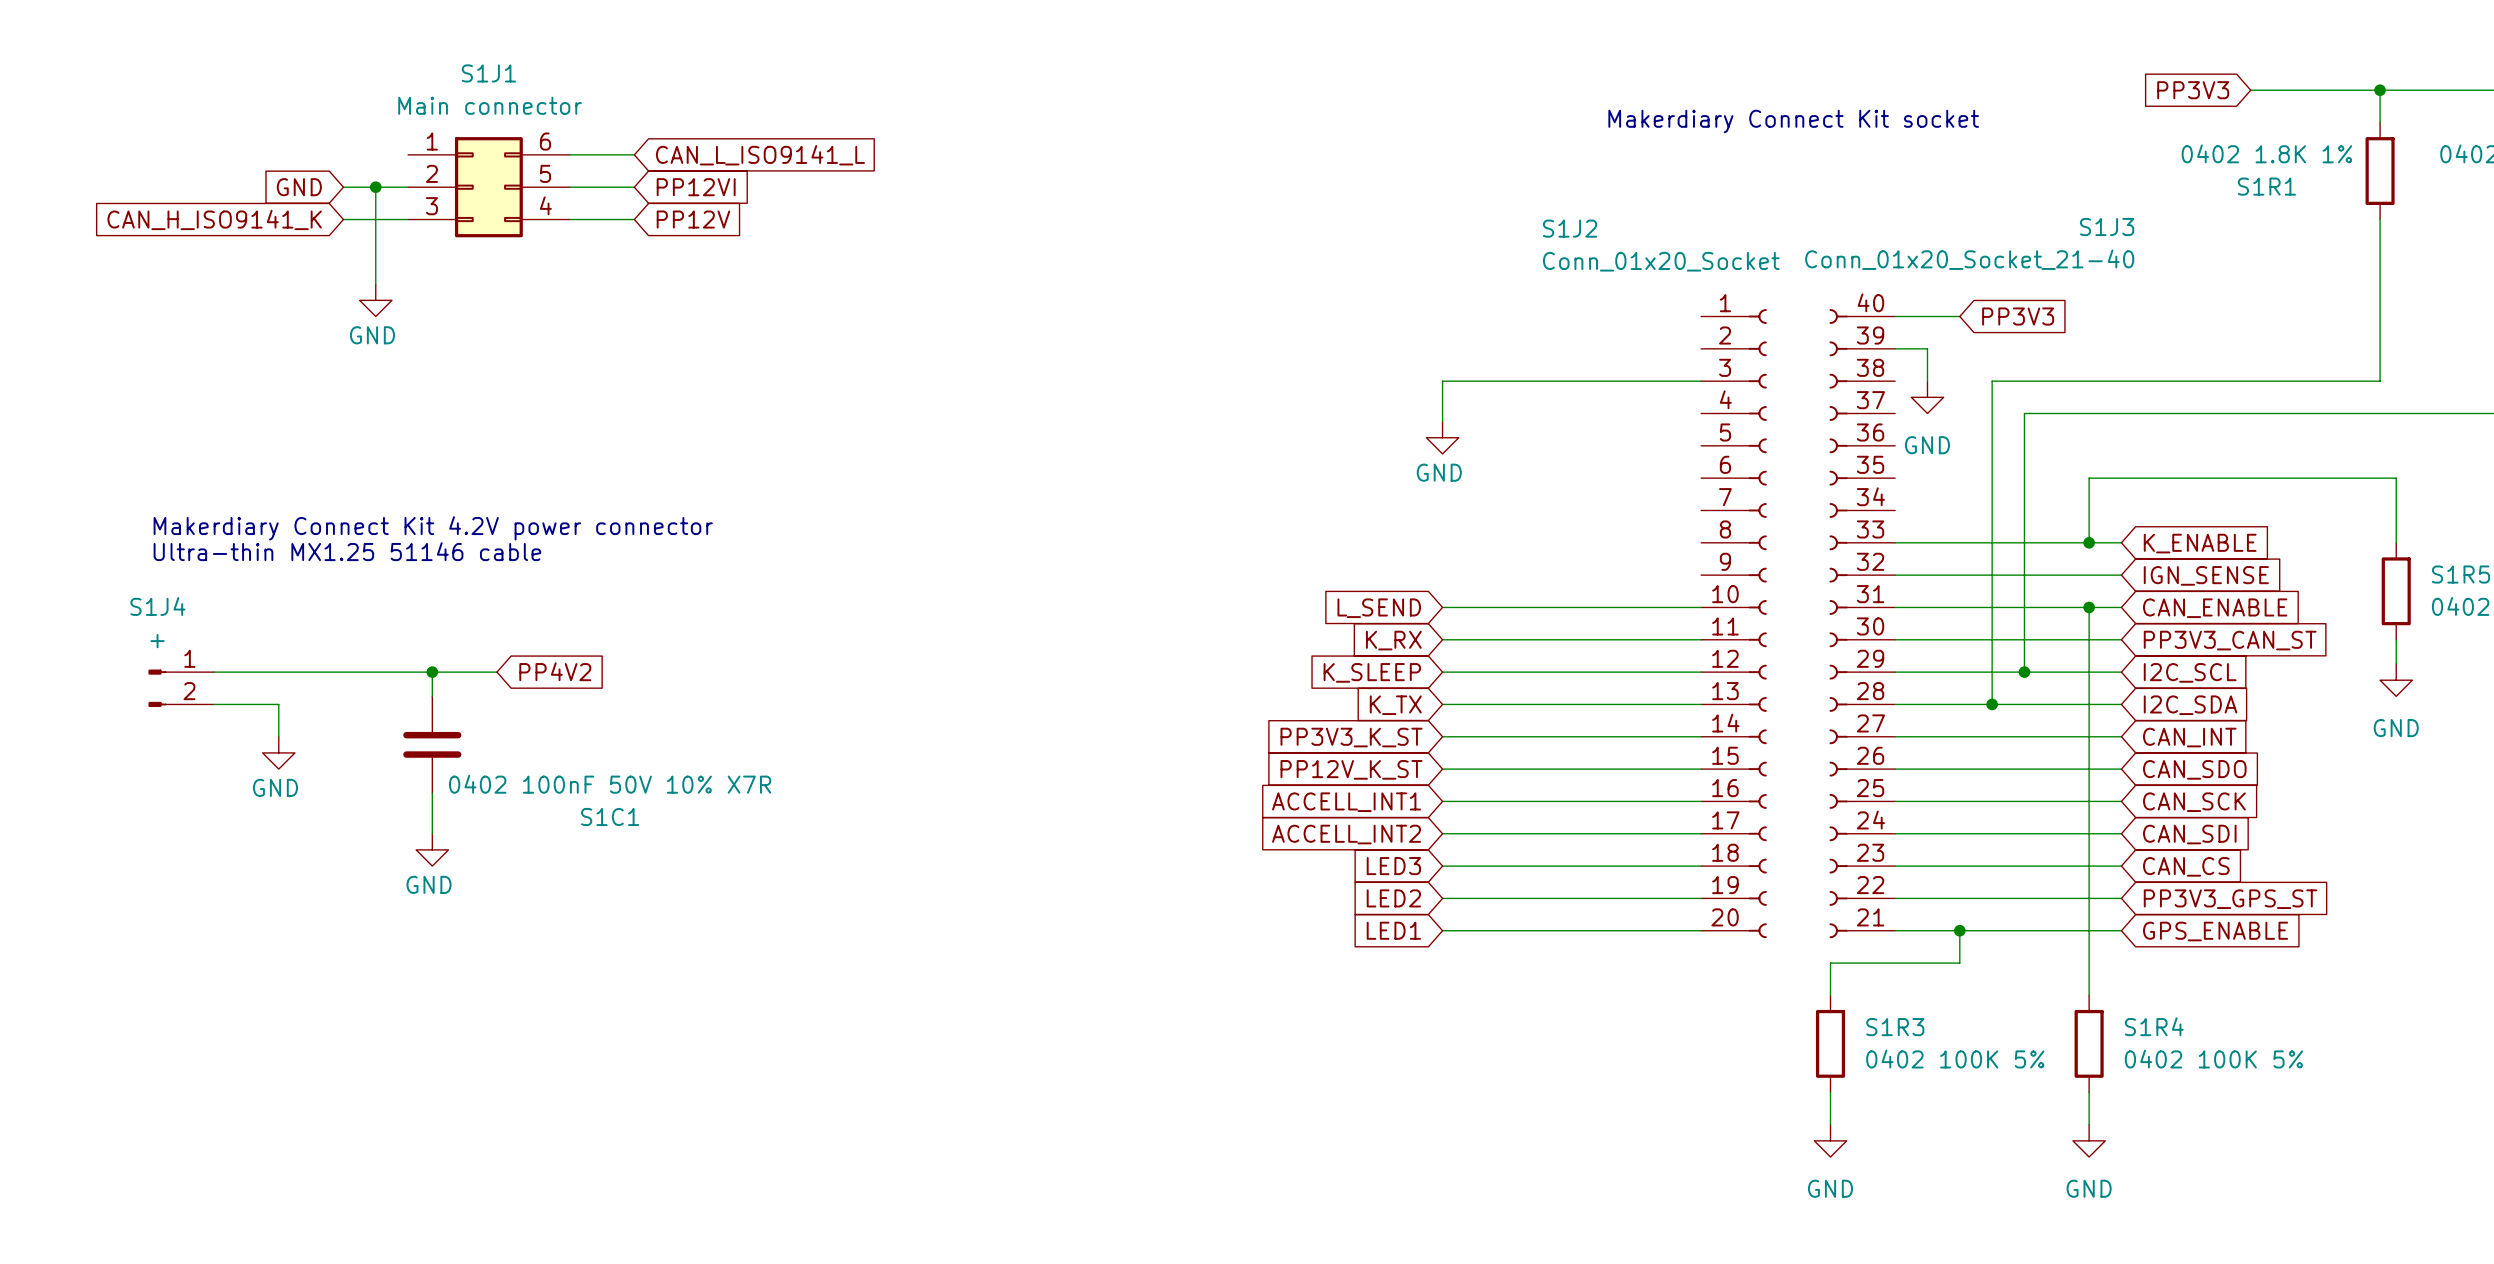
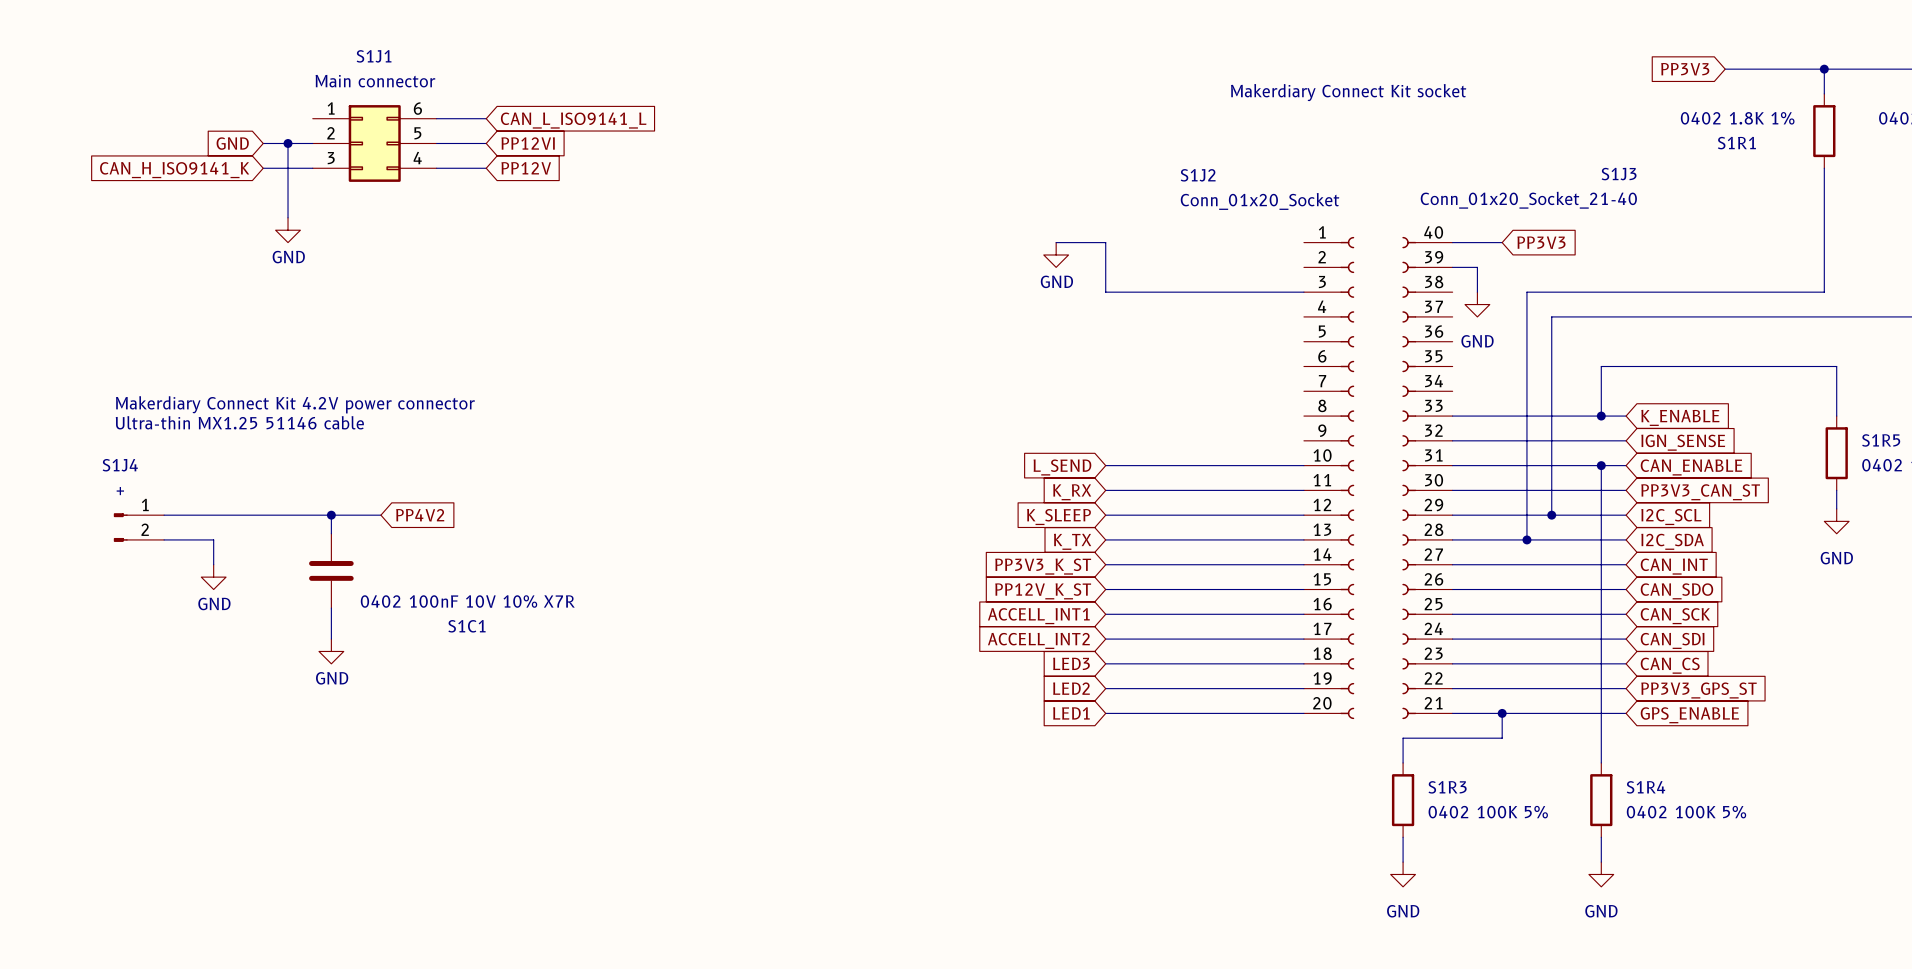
wire: (1442, 381) (1442, 421) -> (1105, 292) (1105, 242) (1056, 242)
power symbol position: GND (1442, 437) -> GND (1056, 254)
S1C1 value: 0402 100nF 50V 10% X7R (610, 784) -> 0402 100nF 10V 10% X7R (467, 601)

